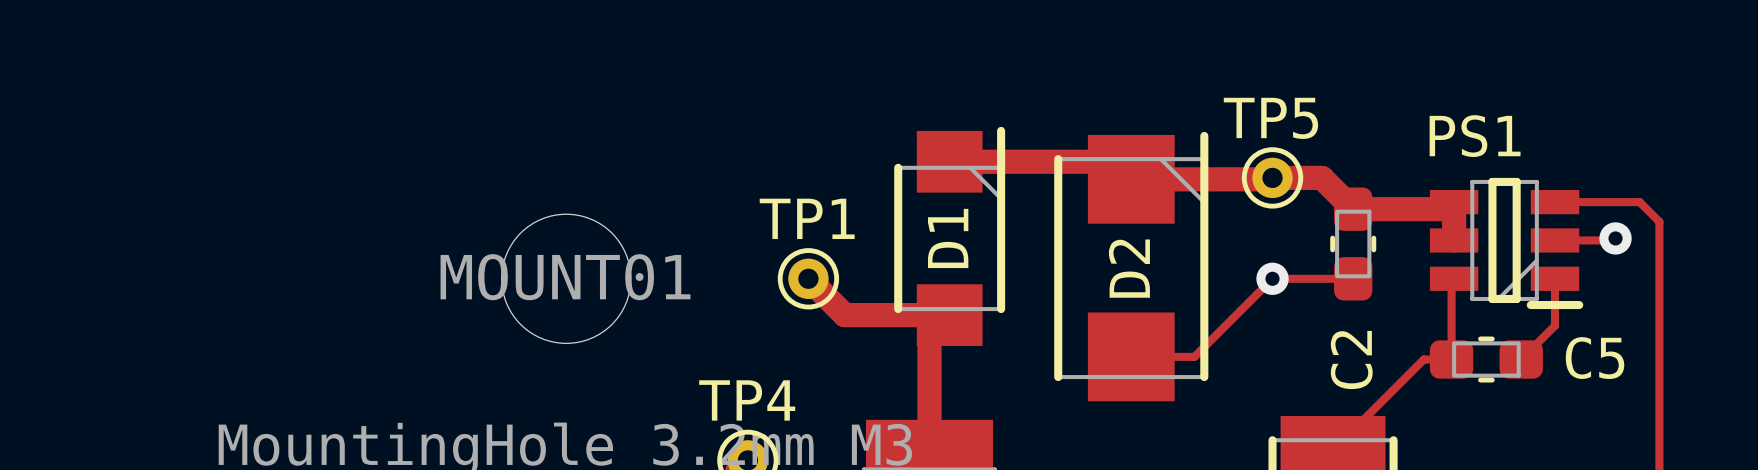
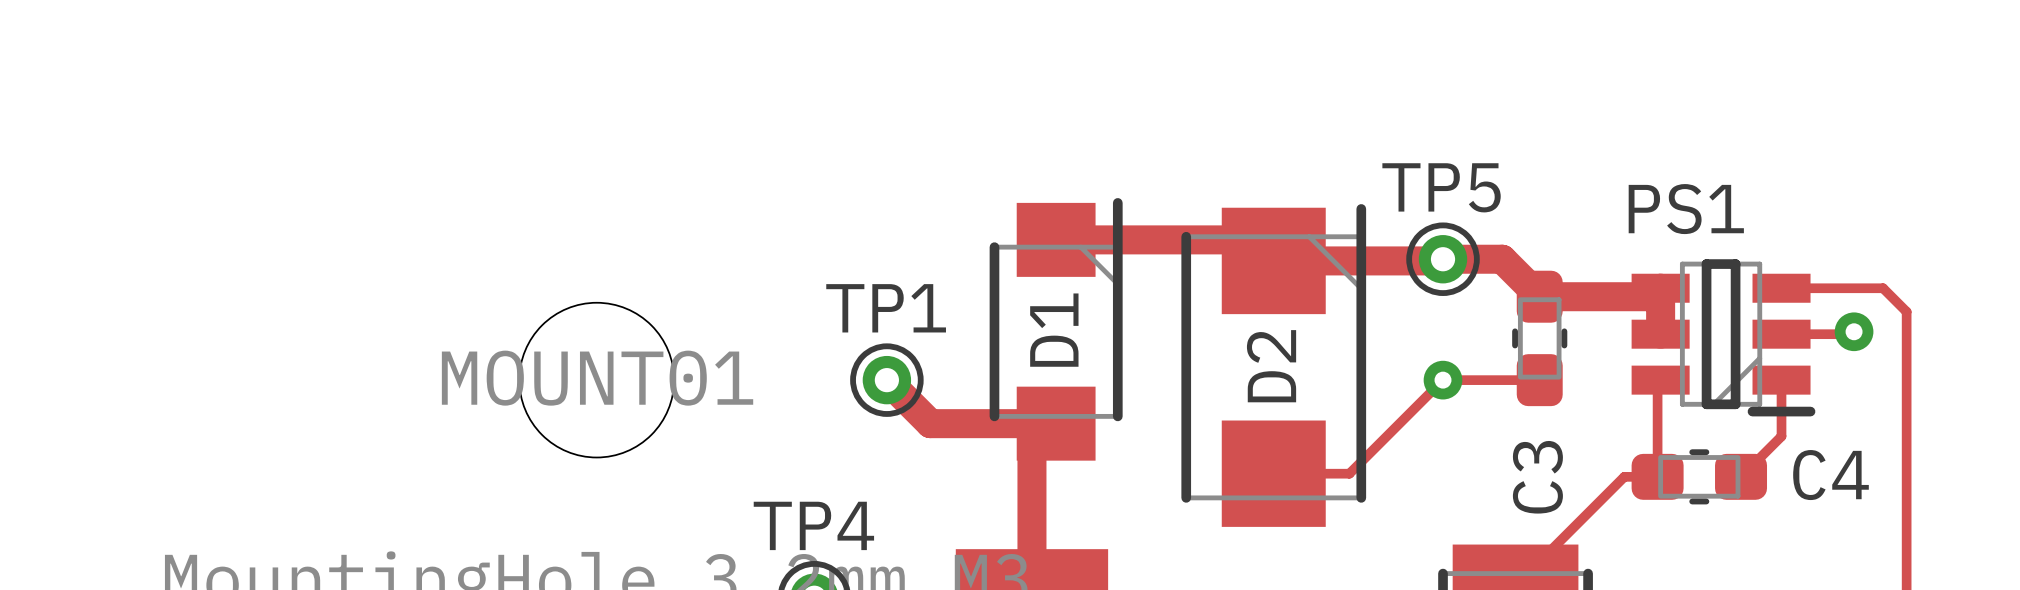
C5 name: C5 (1595, 358) -> C4 (1830, 475)
C2 name: C2 (1351, 359) -> C3 (1537, 477)

